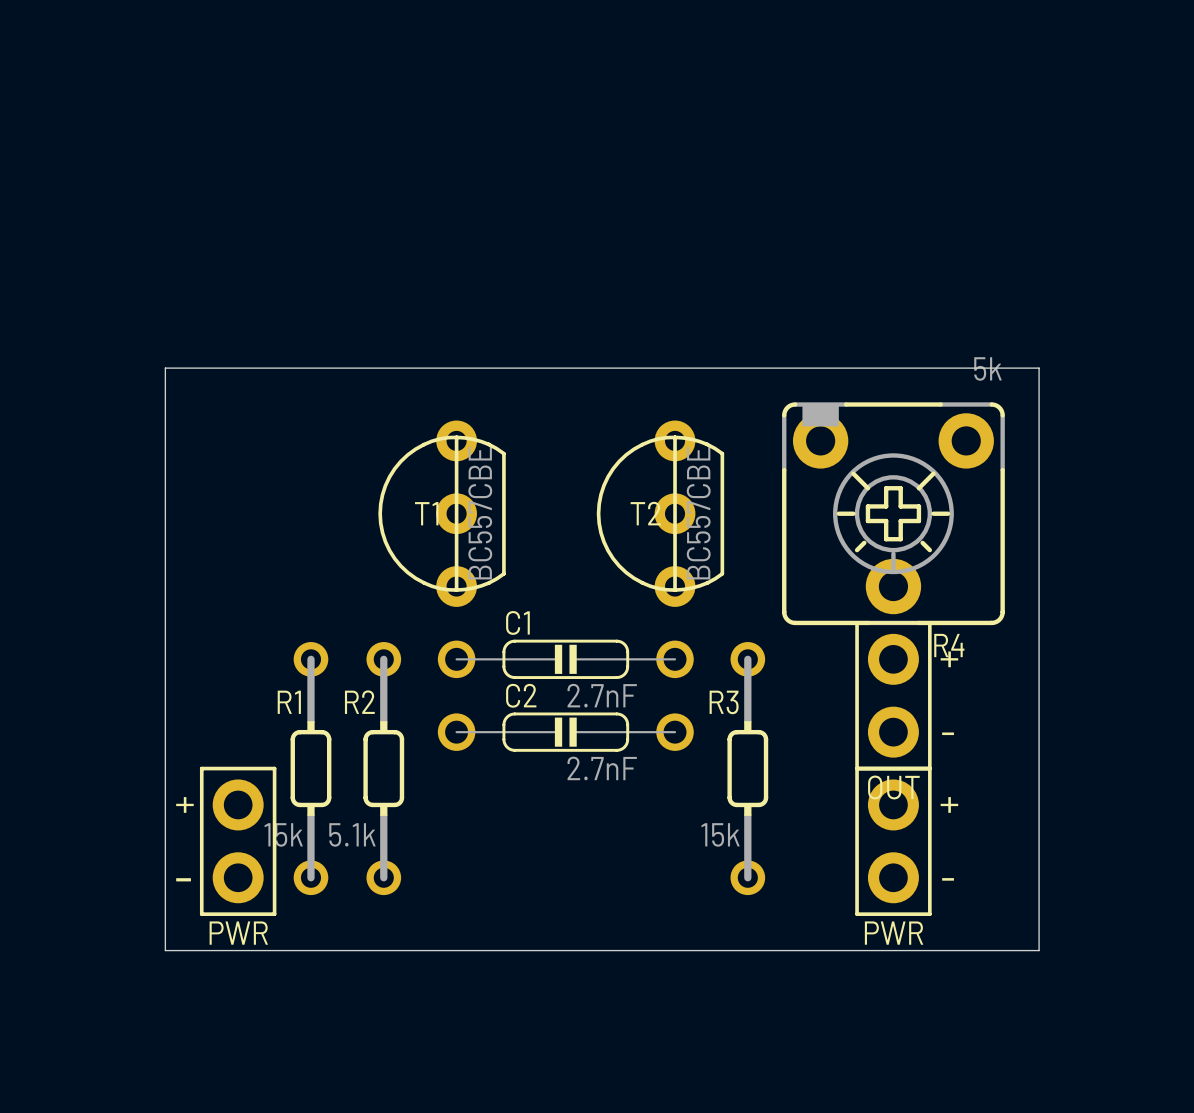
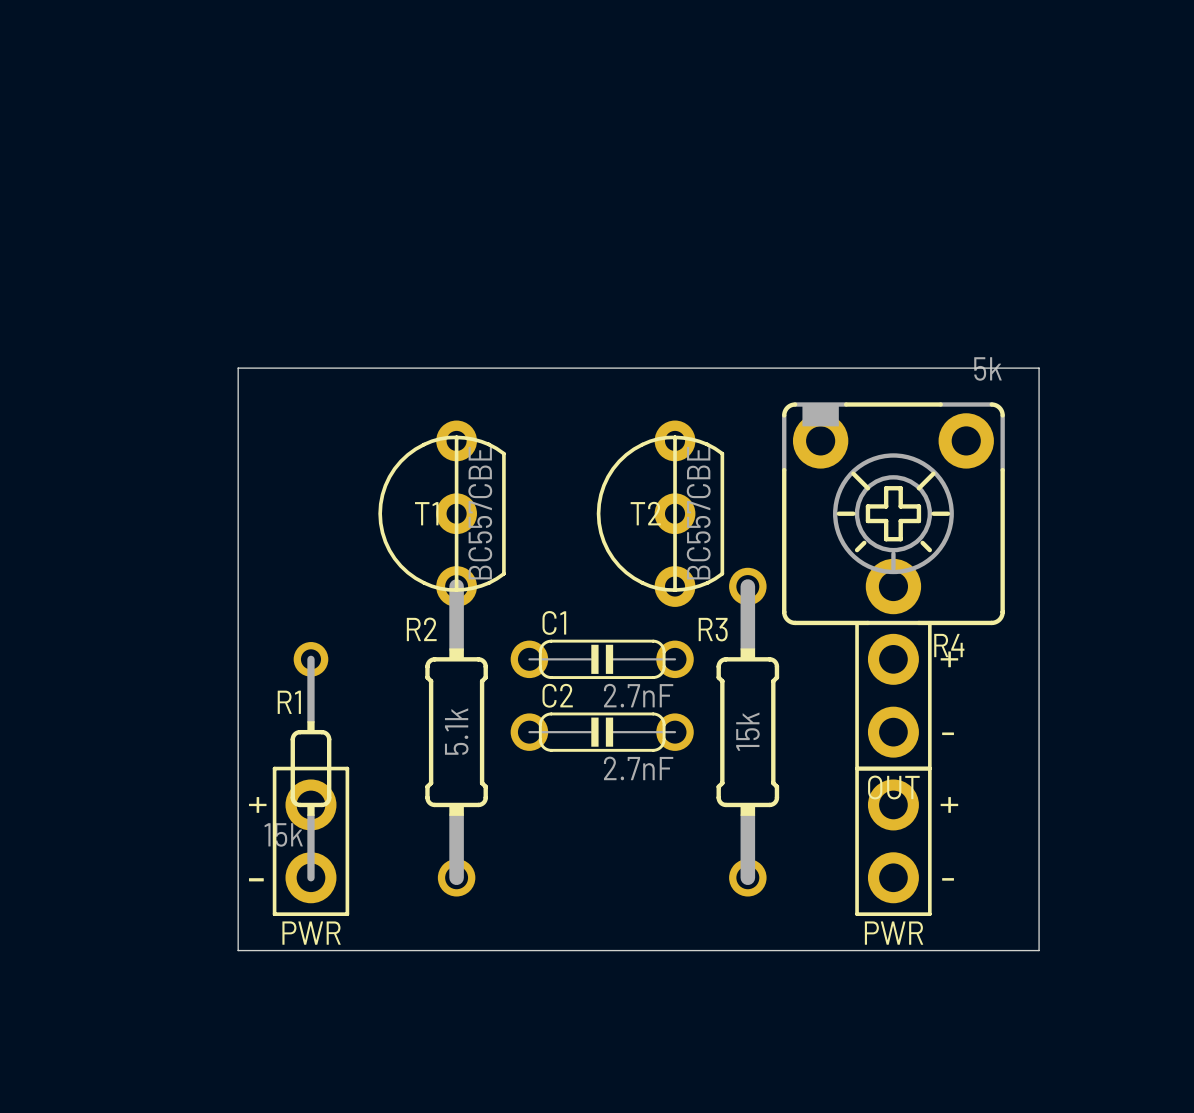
board edge: (238, 368) (165, 368) (165, 950) (238, 950) -> (238, 368) (238, 950)
C1 footprint: [437, 639, 694, 680] -> [510, 639, 694, 680]
R2 footprint: [363, 642, 405, 896] -> [425, 567, 488, 897]
R3 footprint: [727, 642, 769, 896] -> [716, 567, 780, 897]
C2 footprint: [437, 712, 694, 752] -> [510, 712, 694, 752]
R2 value position: 5.1k (352, 834) -> 5.1k (456, 731)
R3 value position: 15k (720, 834) -> 15k (747, 731)
part position: (238, 841) -> (310, 841)

